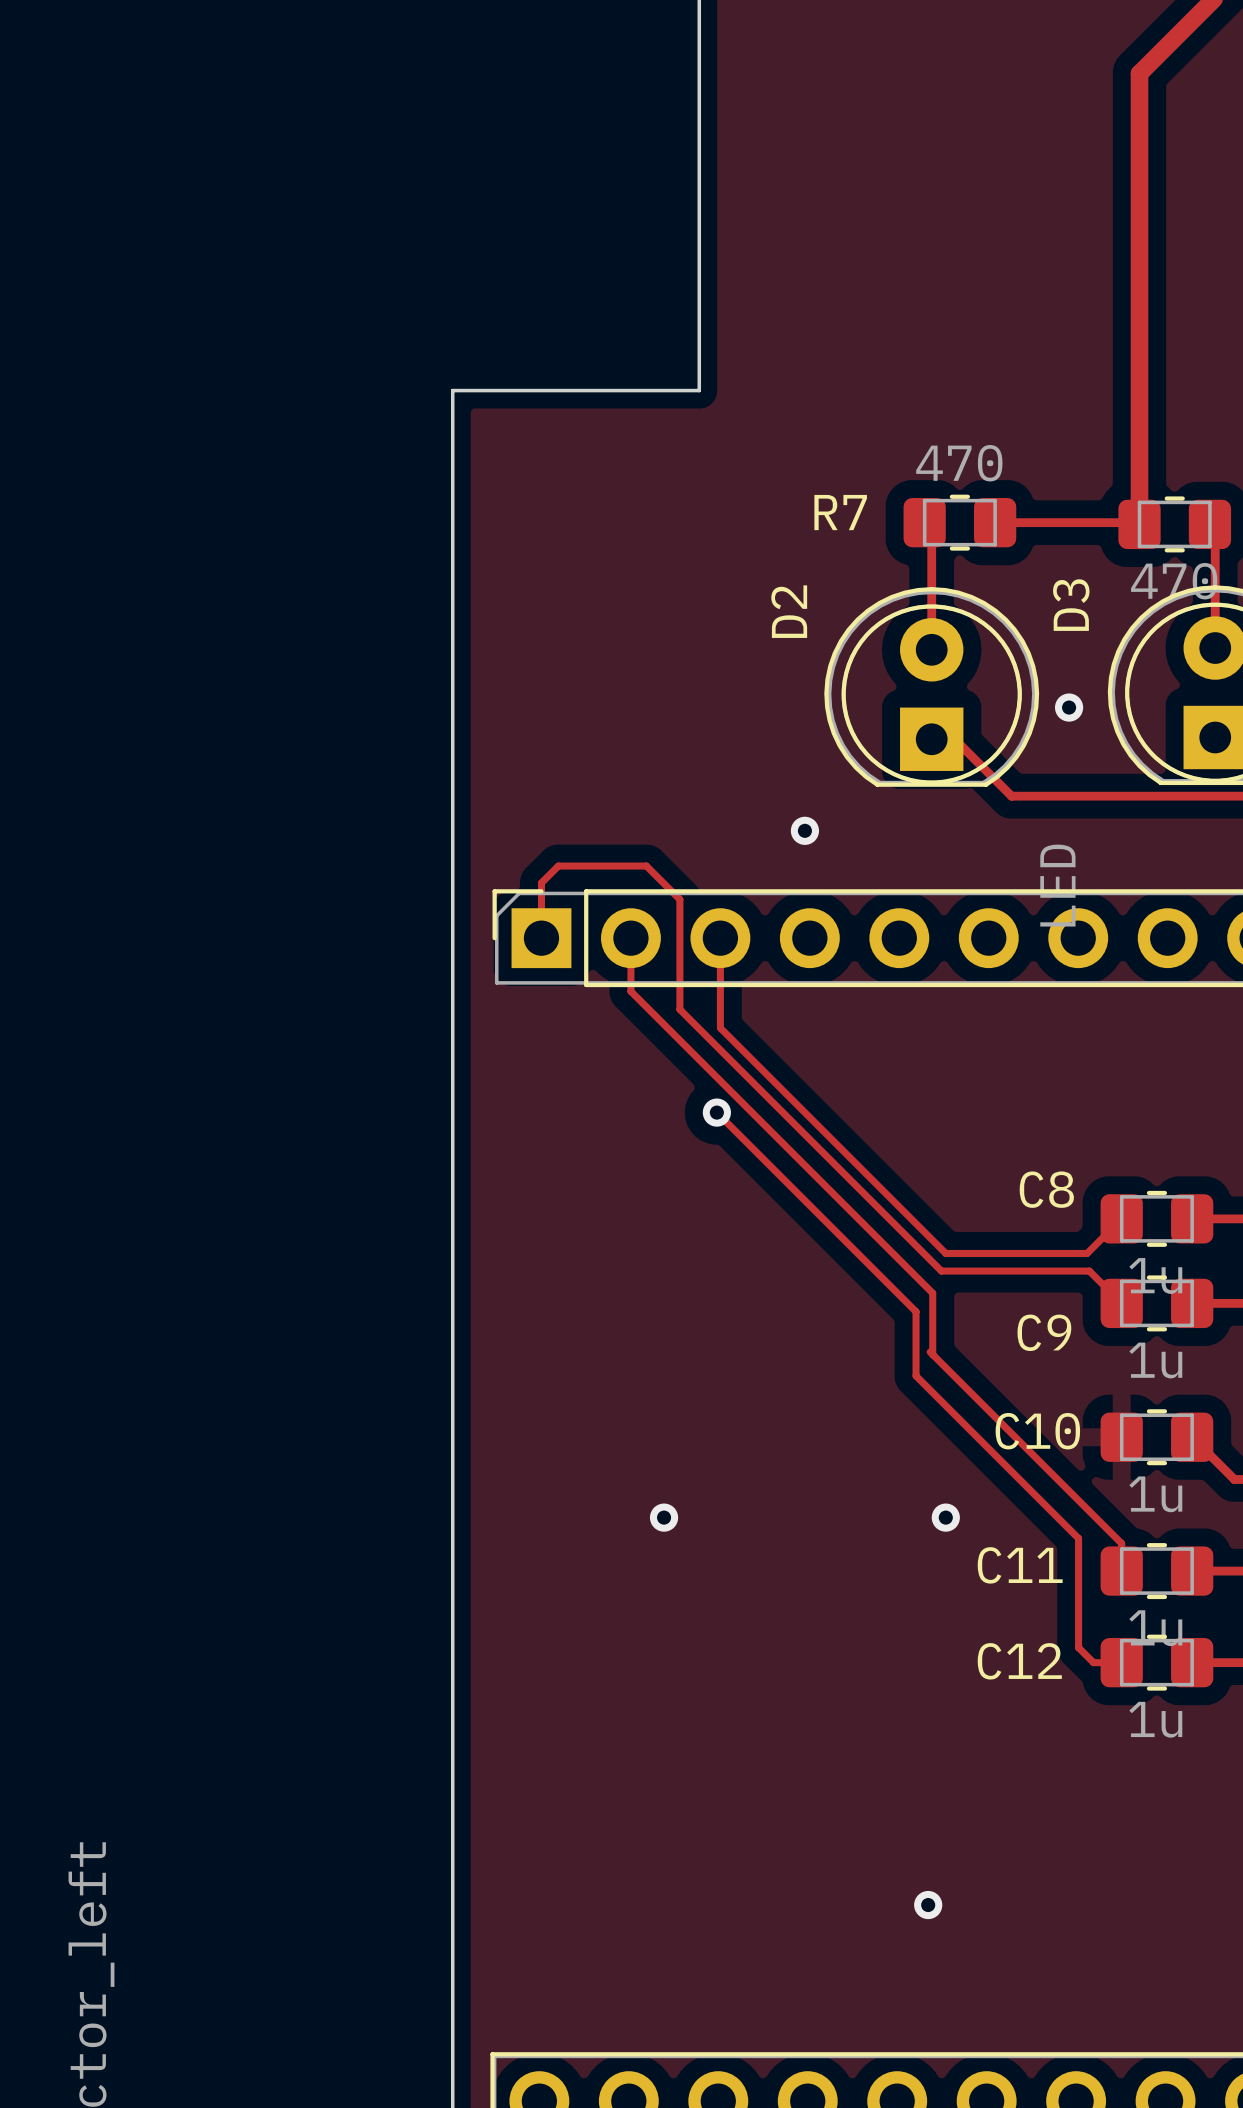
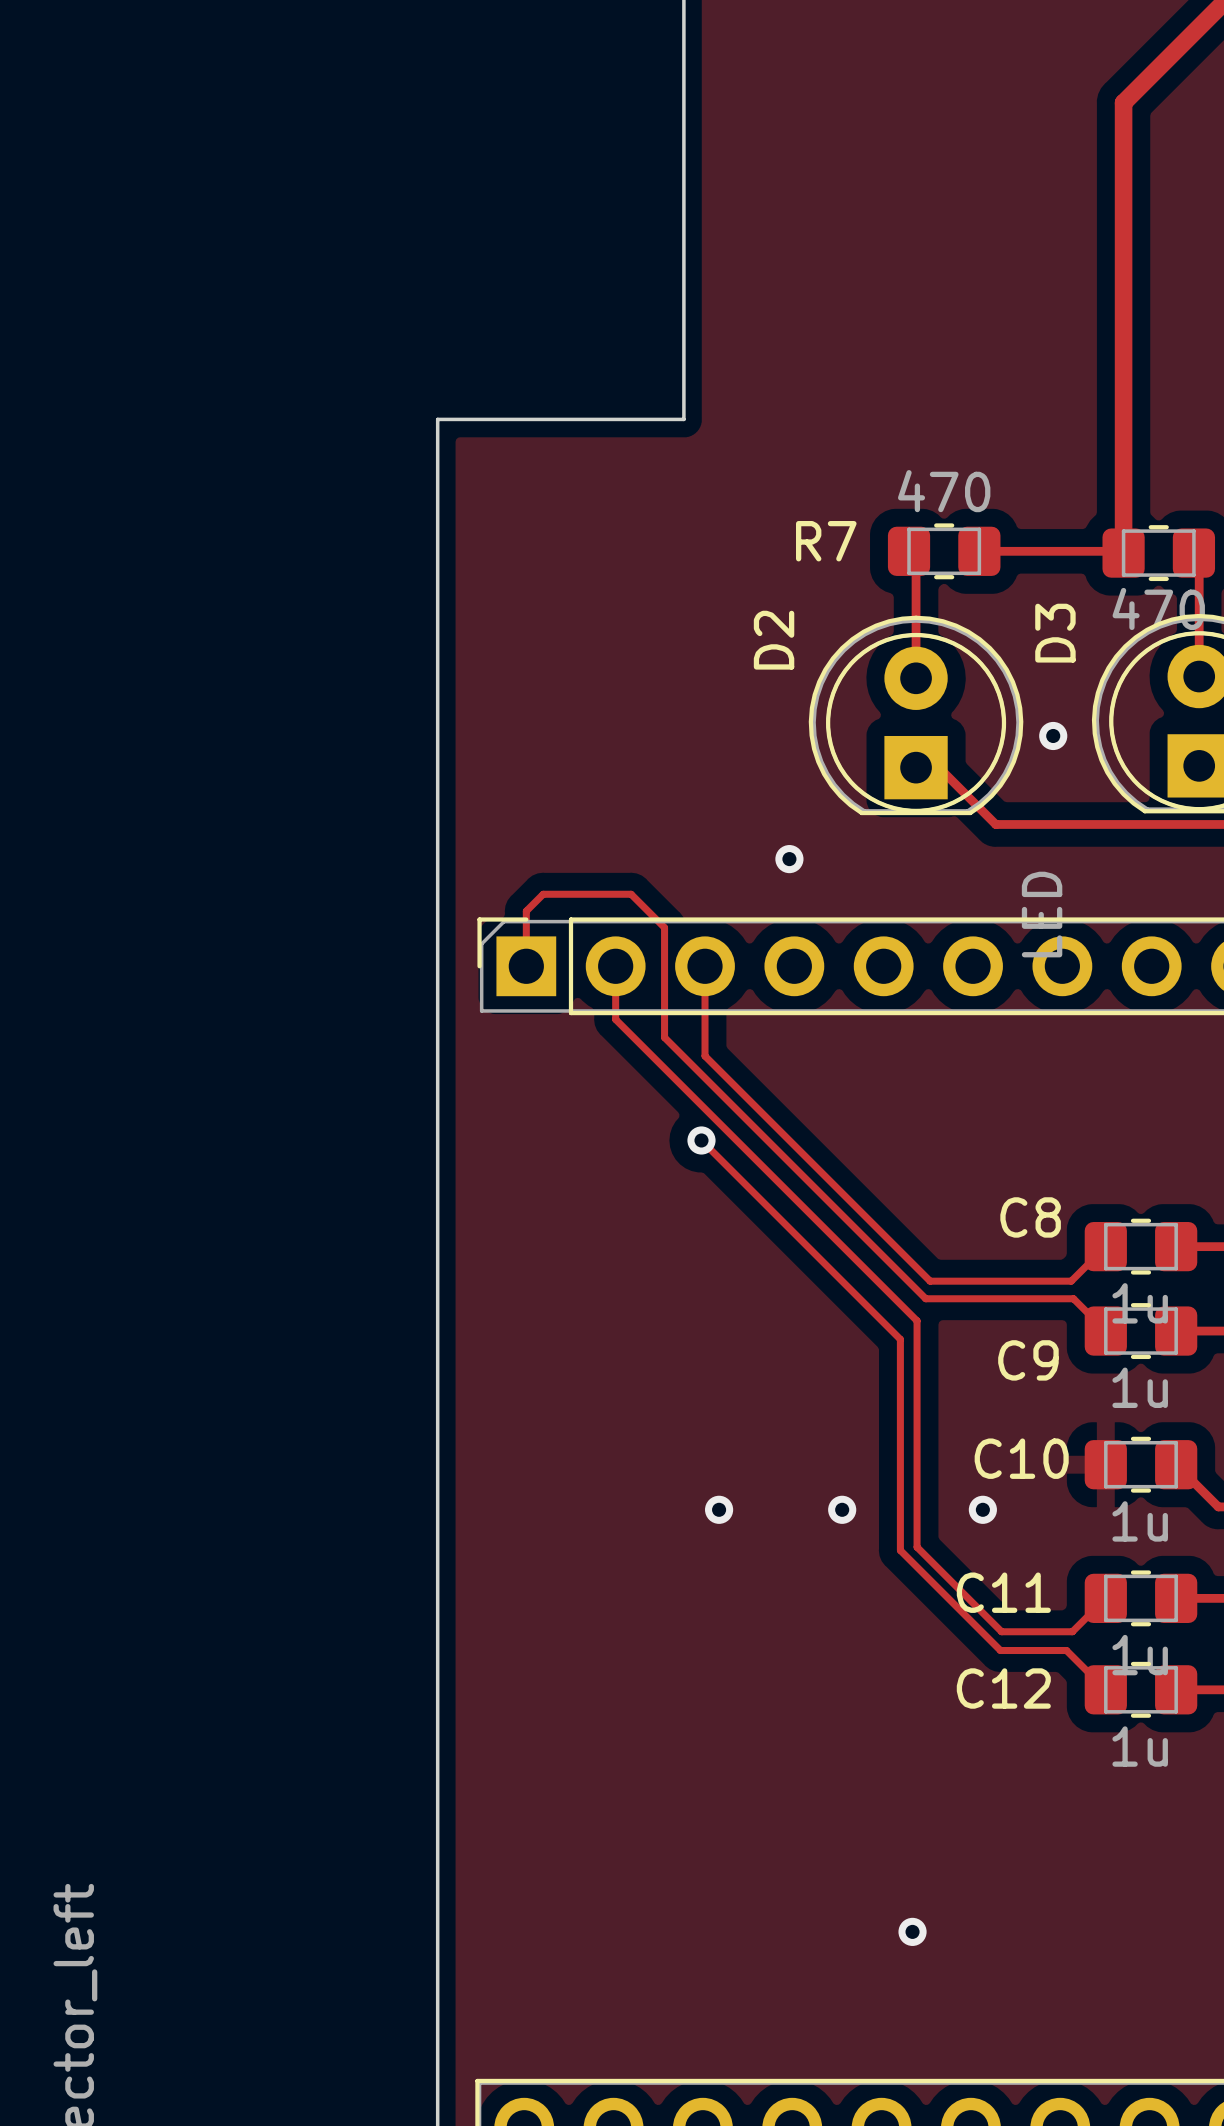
track: (930, 1352) (1121, 1543) (1121, 1571) -> (917, 1382) (917, 1547) (1001, 1631) (1072, 1631) (1105, 1598)
track: (916, 1375) (1078, 1538) (1078, 1647) (1093, 1662) (1121, 1662) -> (900, 1403) (900, 1550) (1000, 1650) (1066, 1650) (1105, 1689)
via: none -> (842, 1509)
via: none -> (982, 1509)
via position: (664, 1517) -> (719, 1509)
via: (945, 1517) -> none

